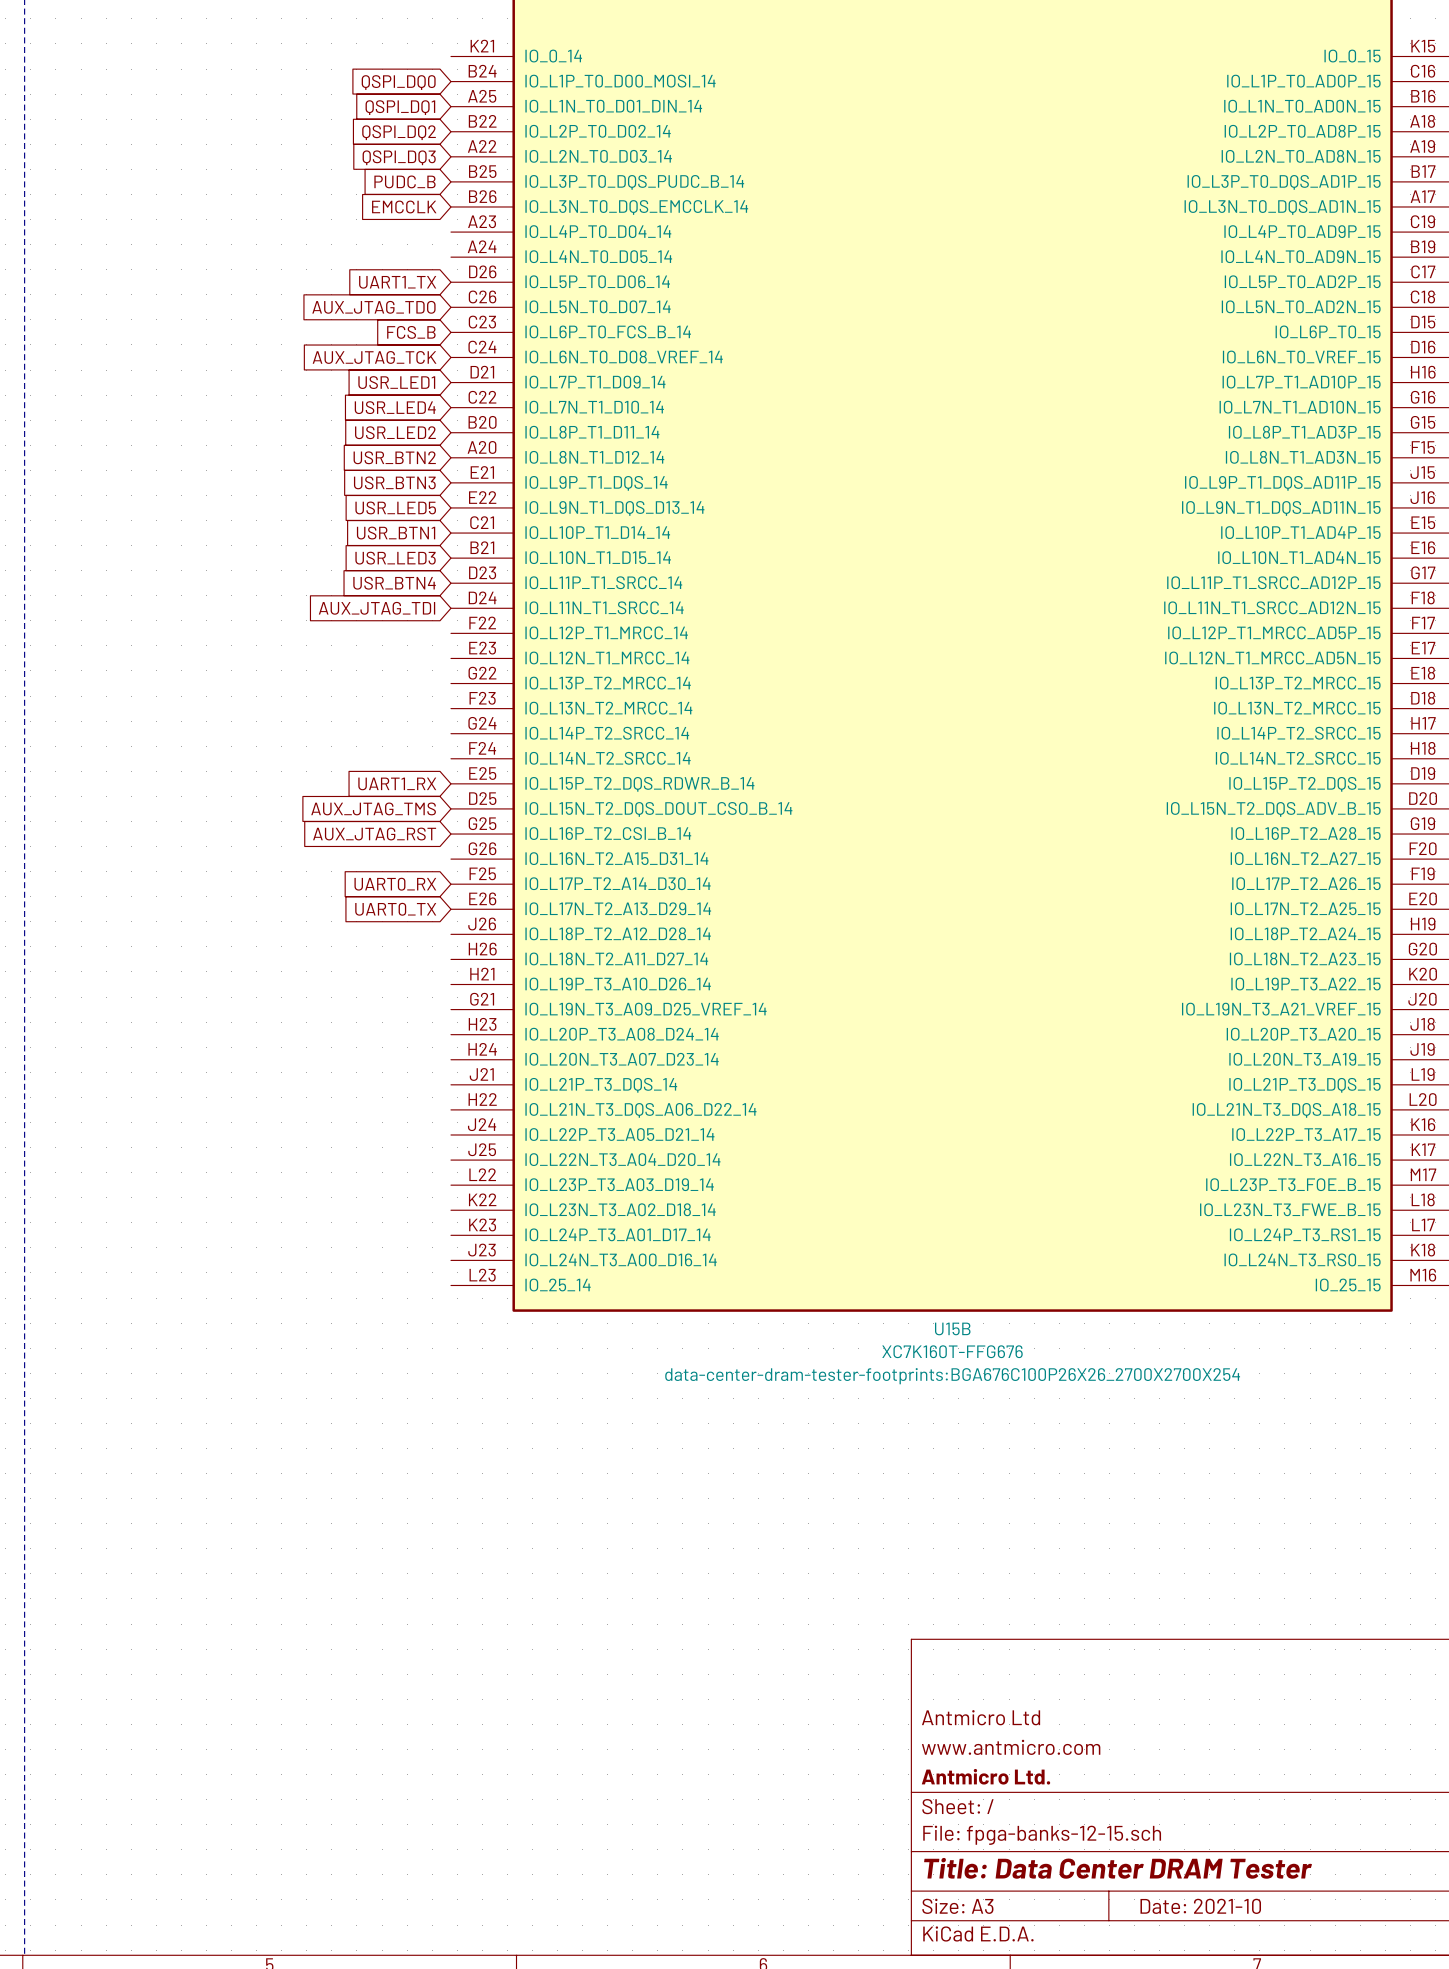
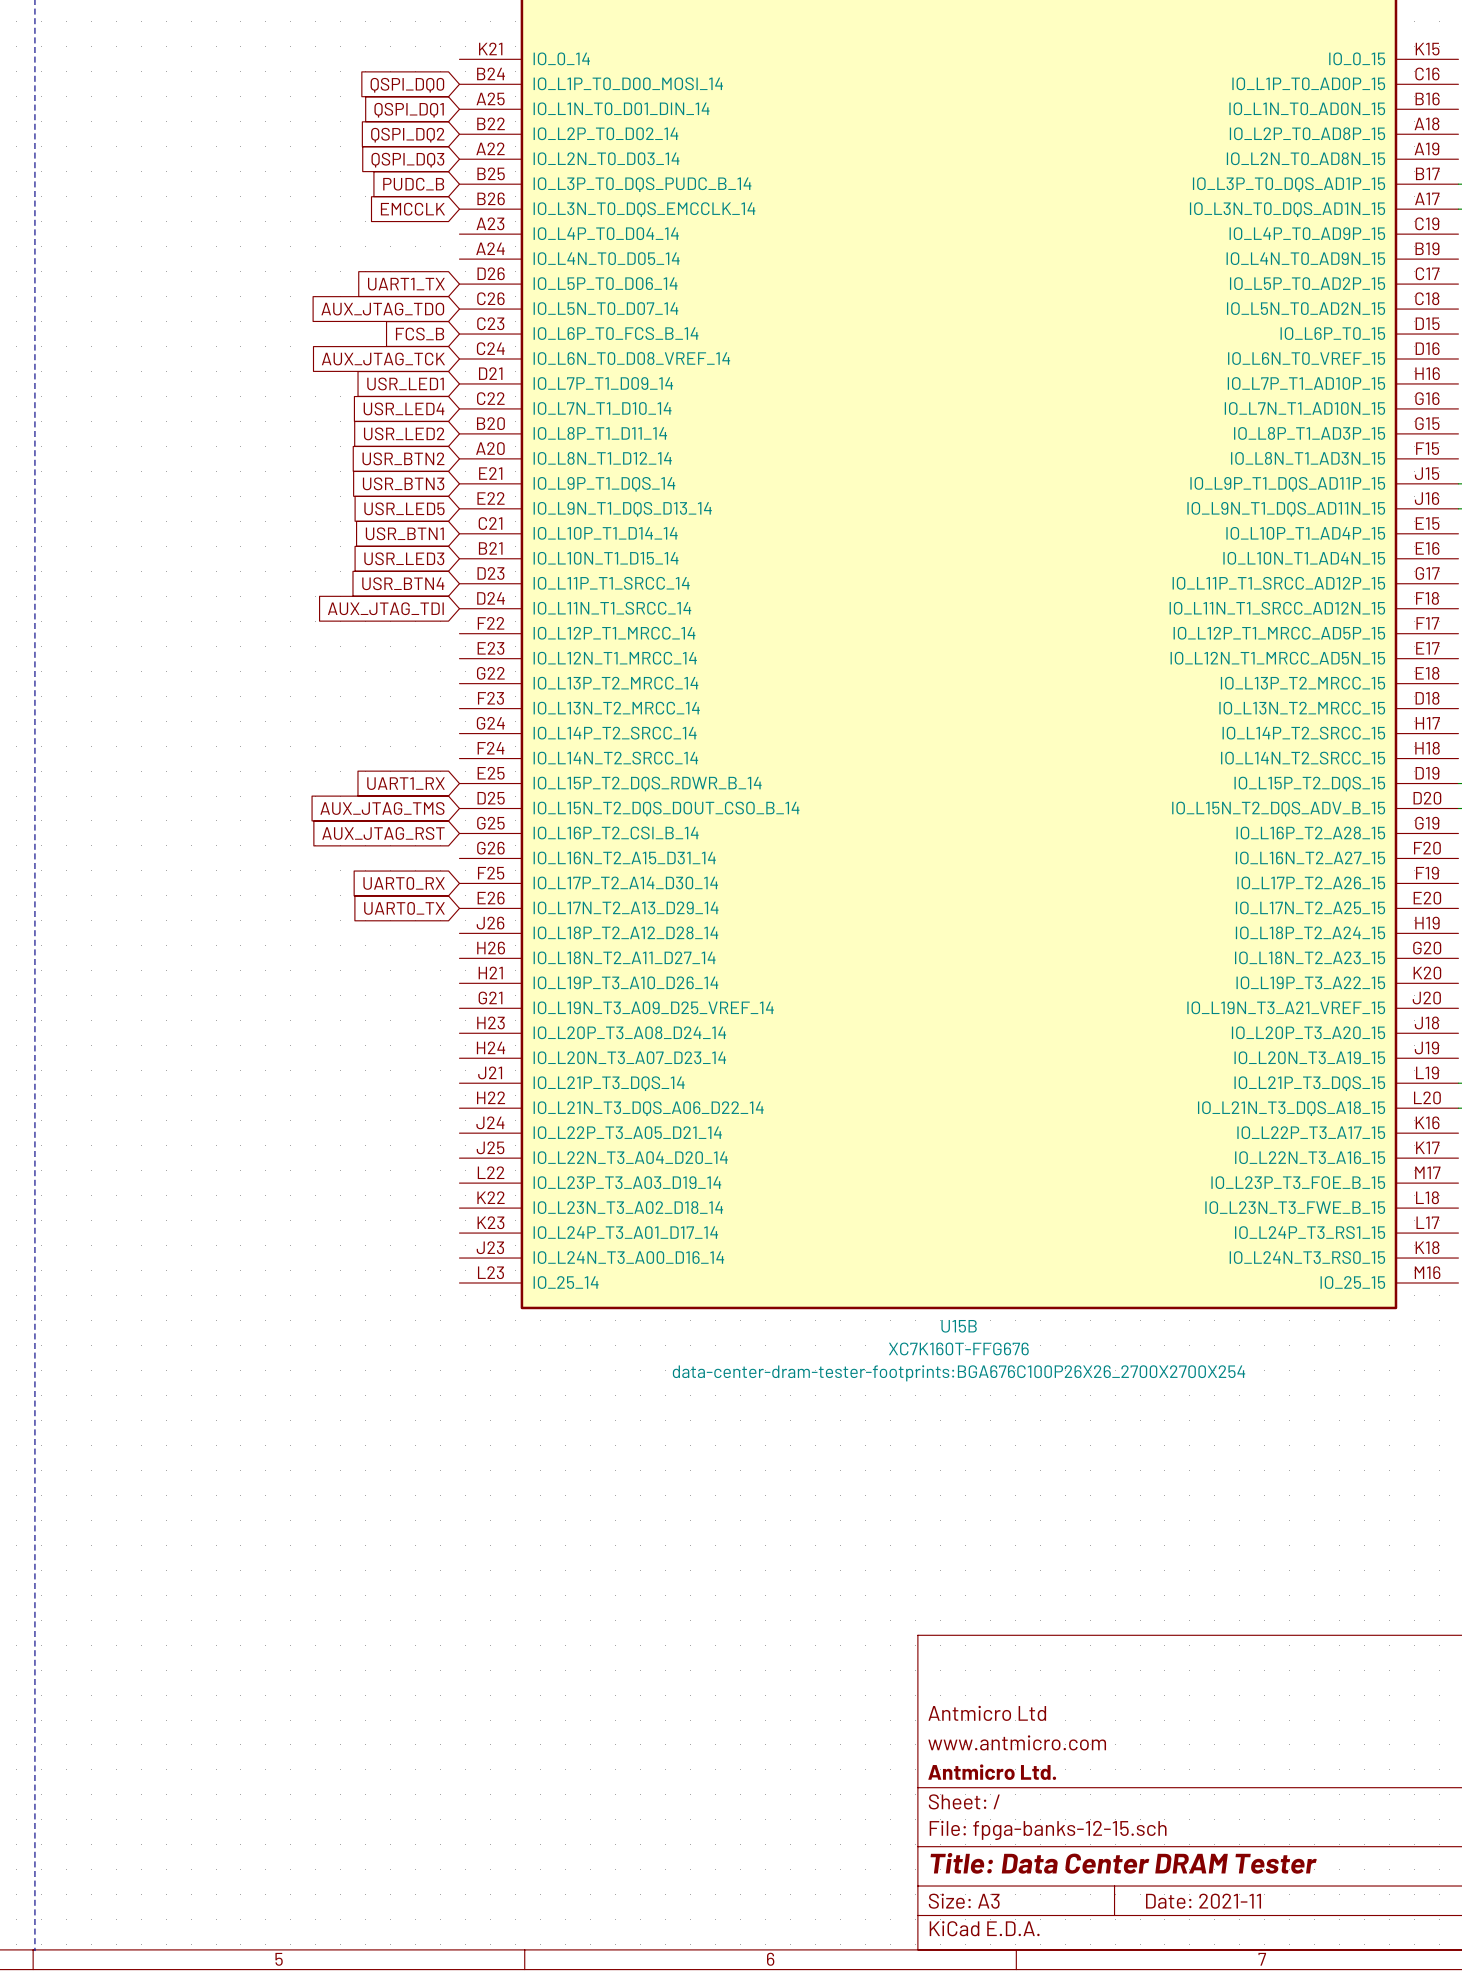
title block: Date: 2021-10 (1200, 1906) -> Date: 2021-11 (1203, 1901)

